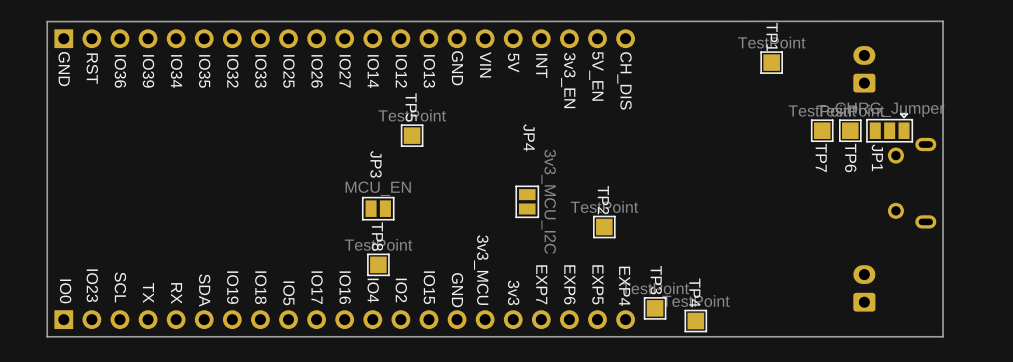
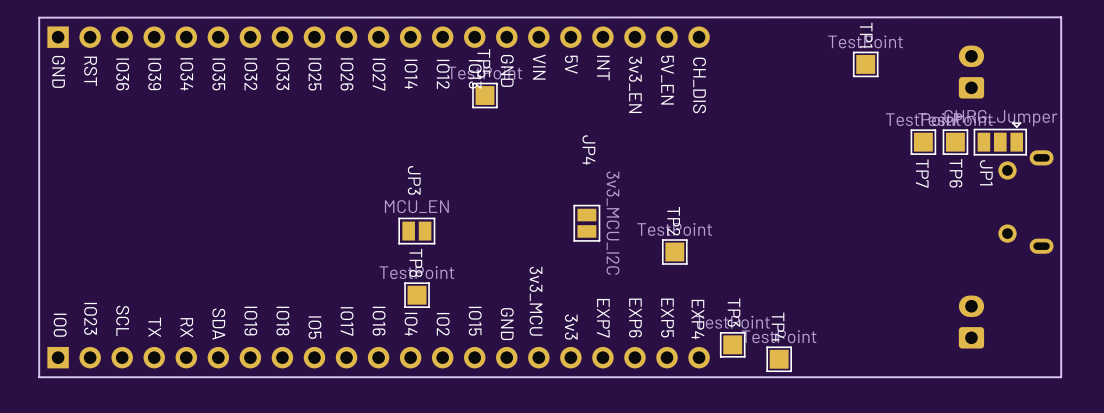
TP5 position: (412, 135) -> (484, 95)

